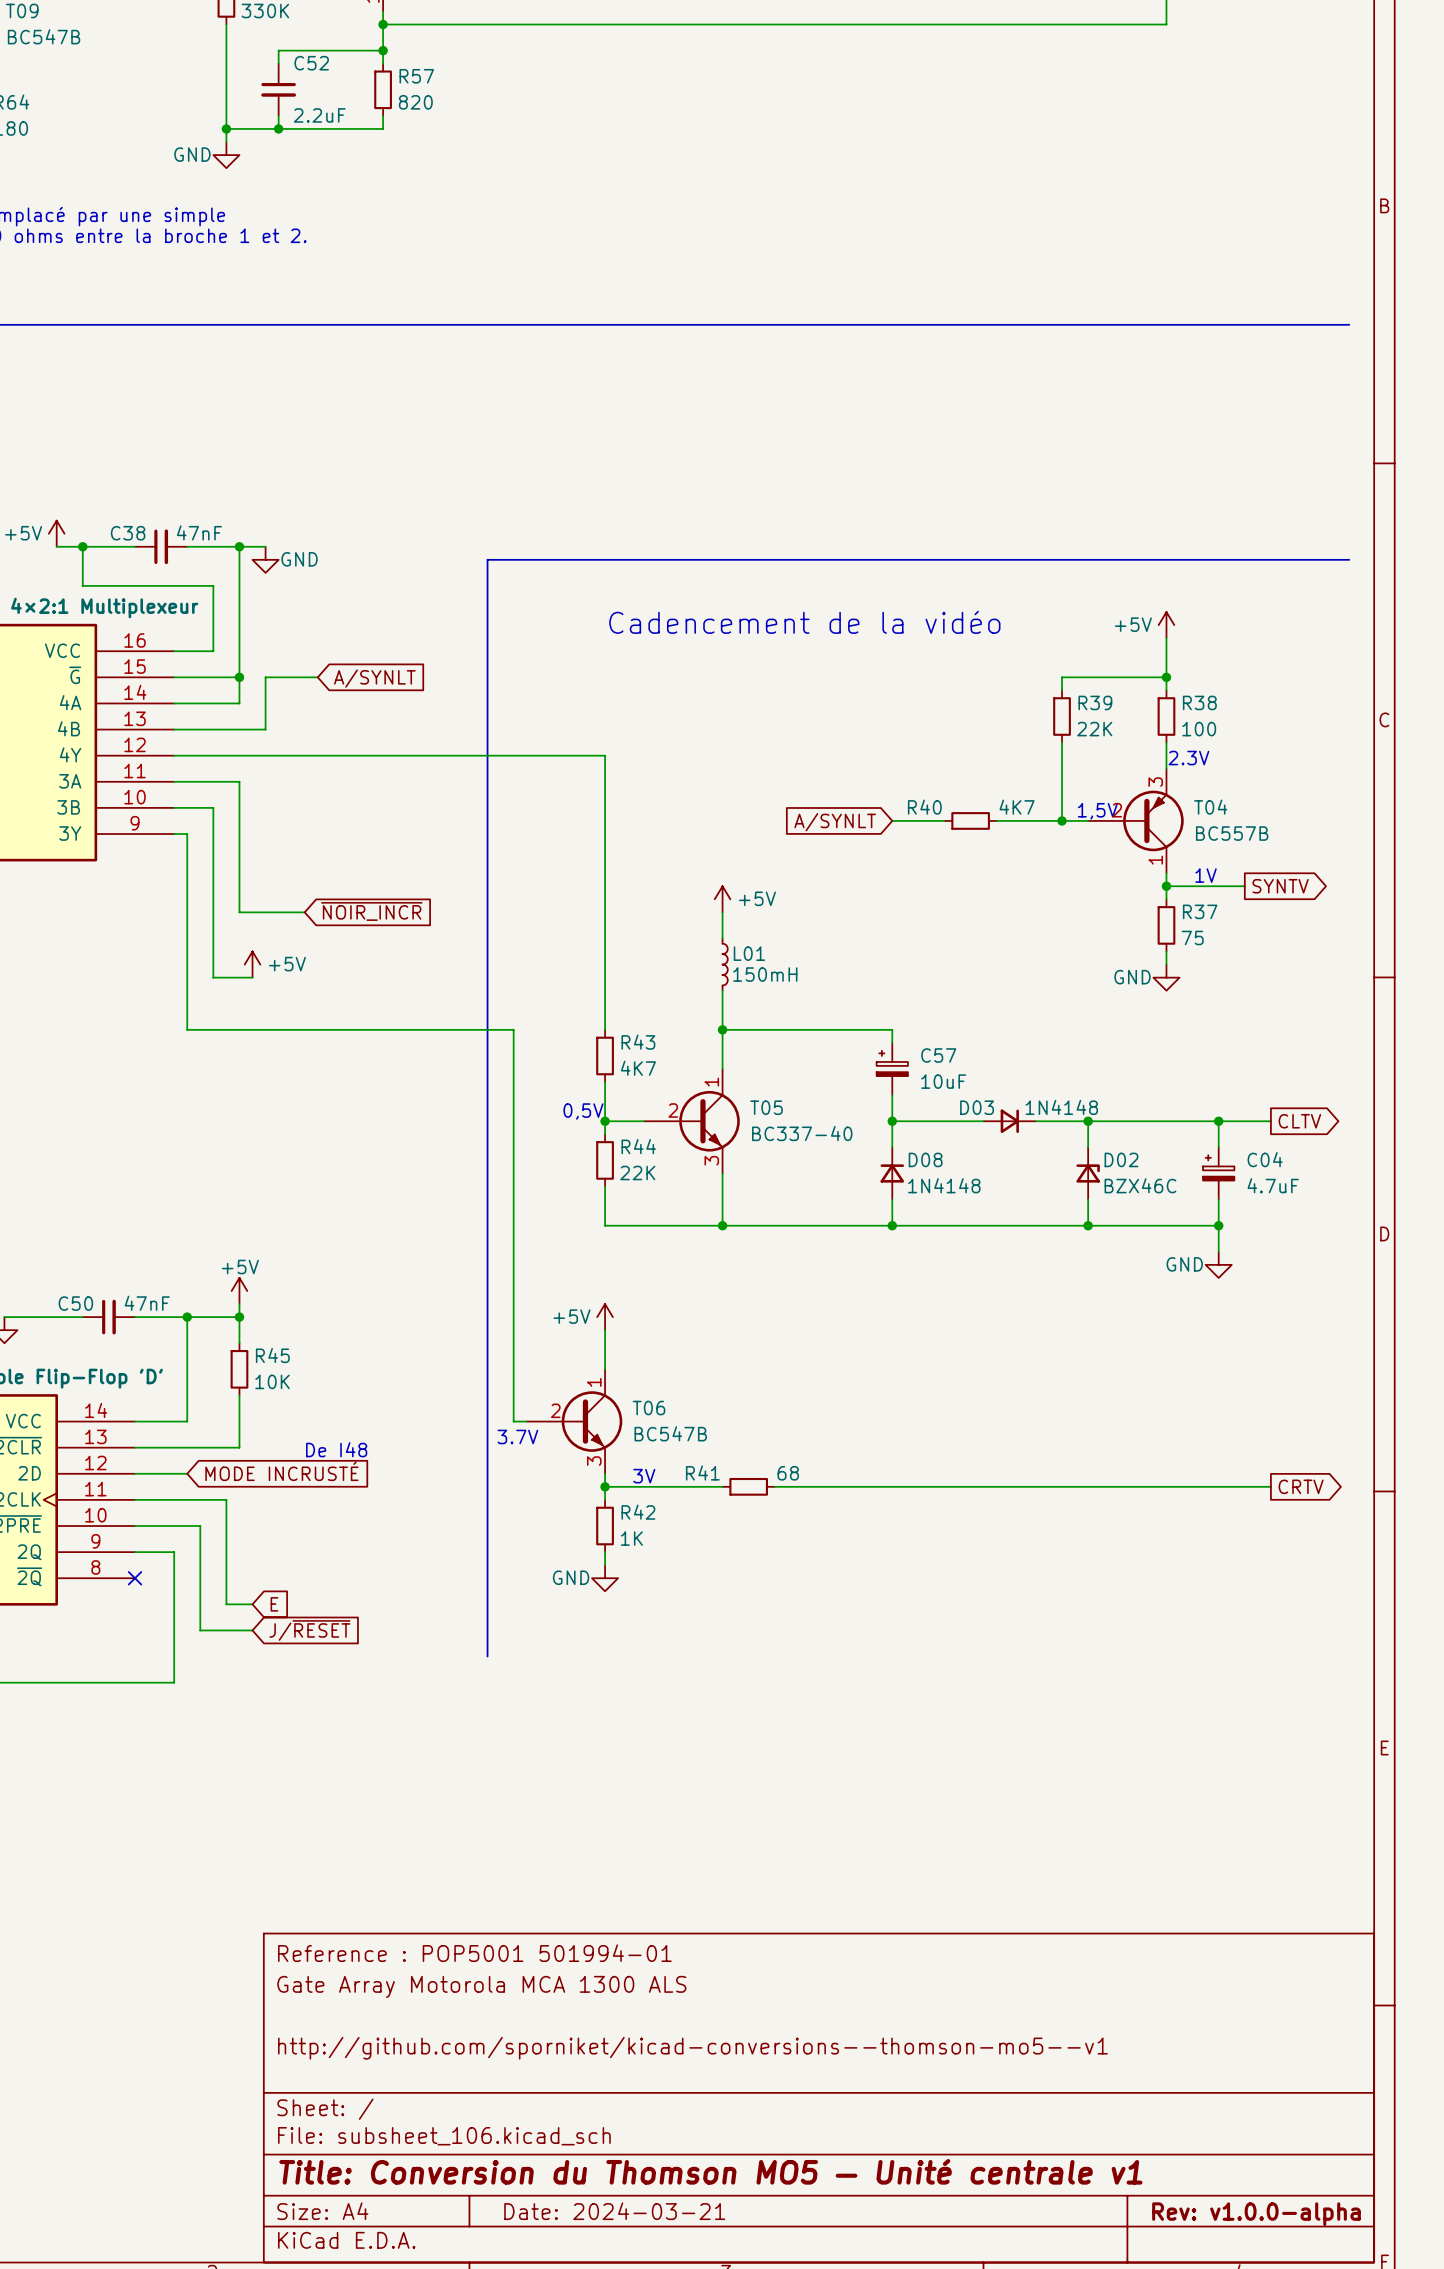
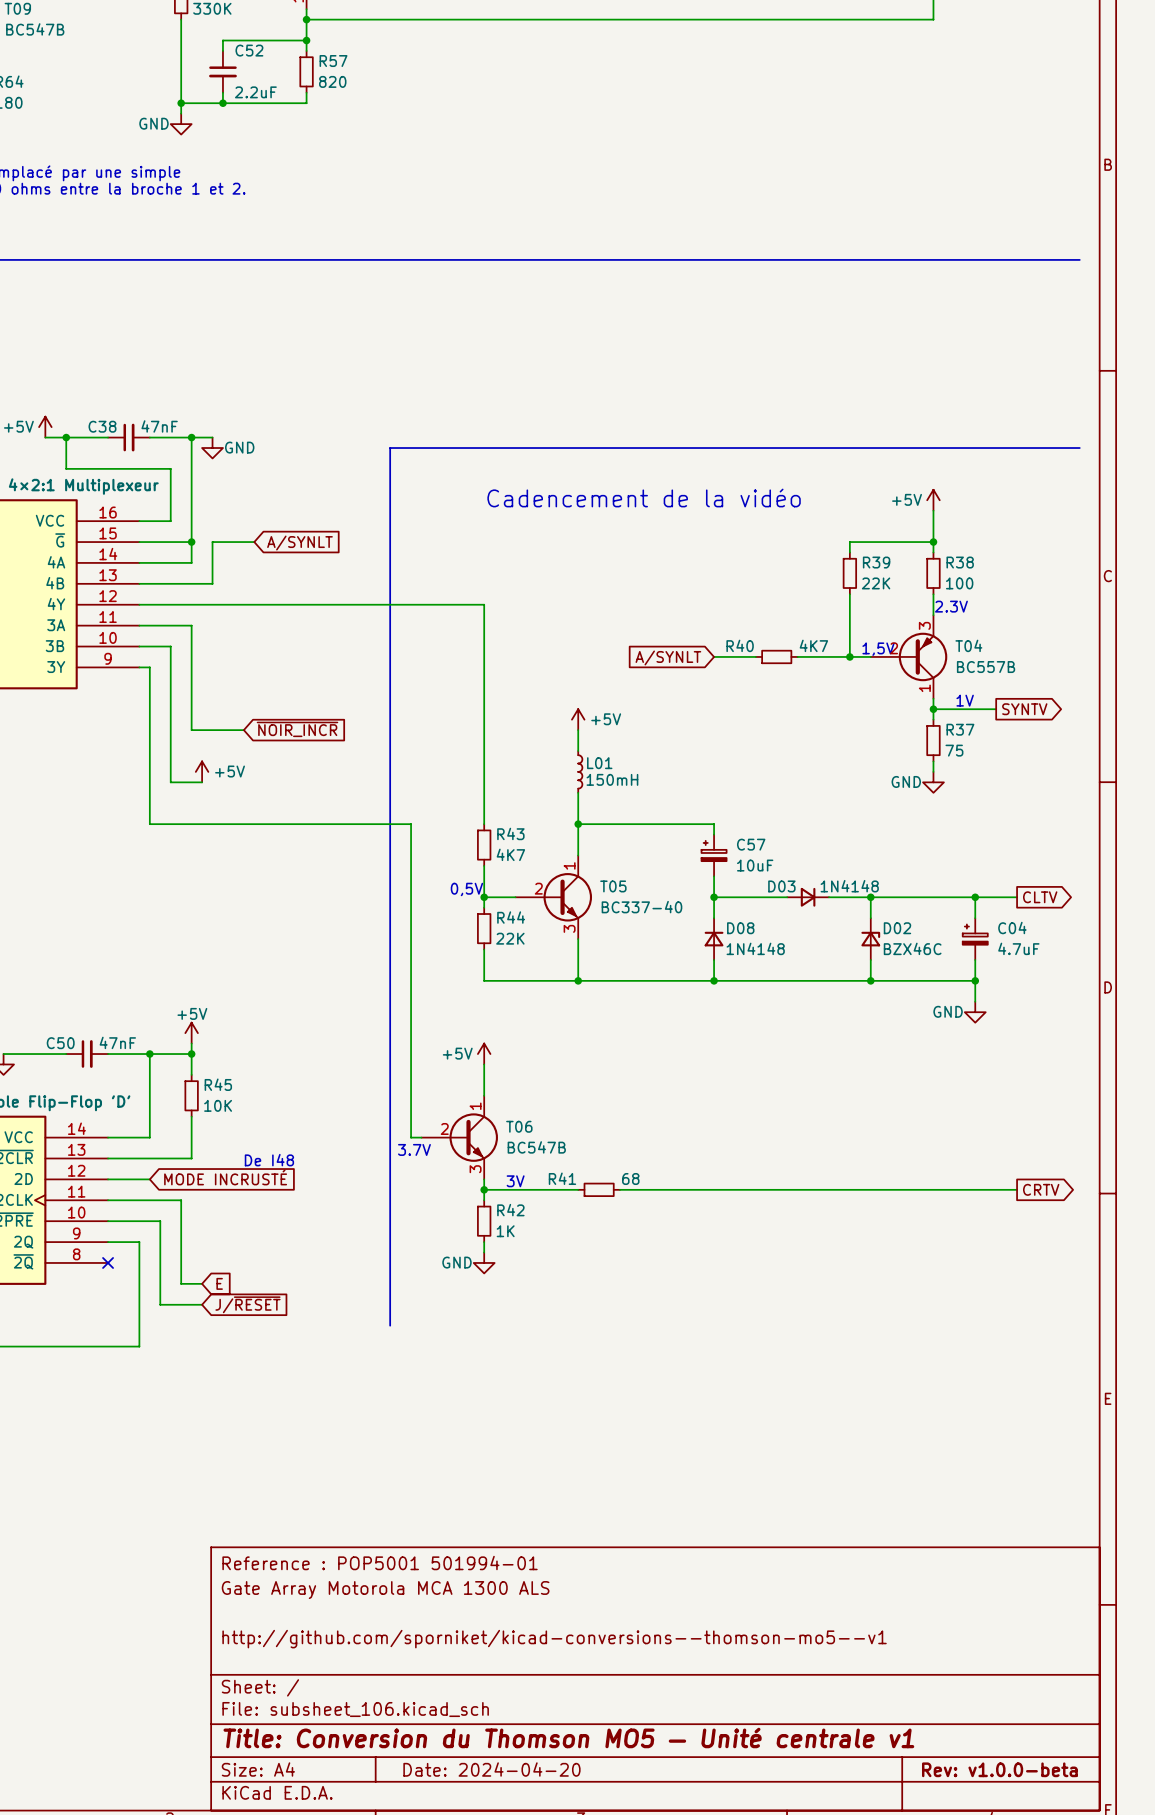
title block: Date: 2024-03-21 (614, 2211) -> Date: 2024-04-20 (491, 1769)
title block: Rev: v1.0.0-alpha (1256, 2214) -> Rev: v1.0.0-beta (999, 1769)

